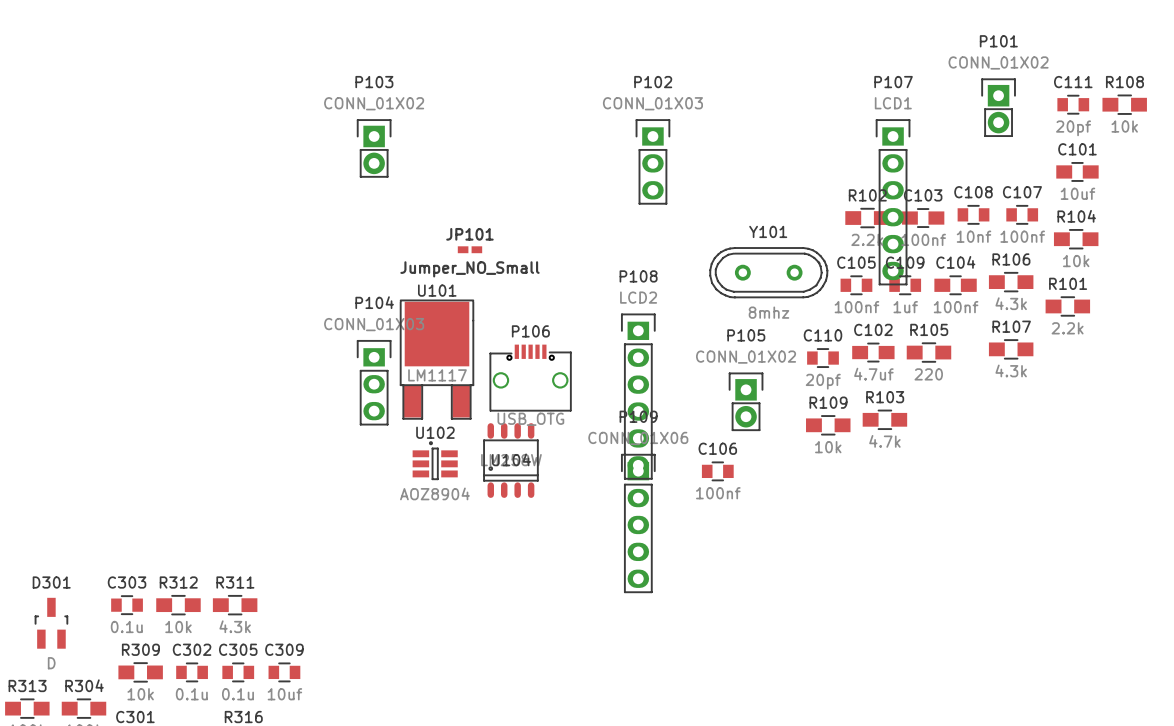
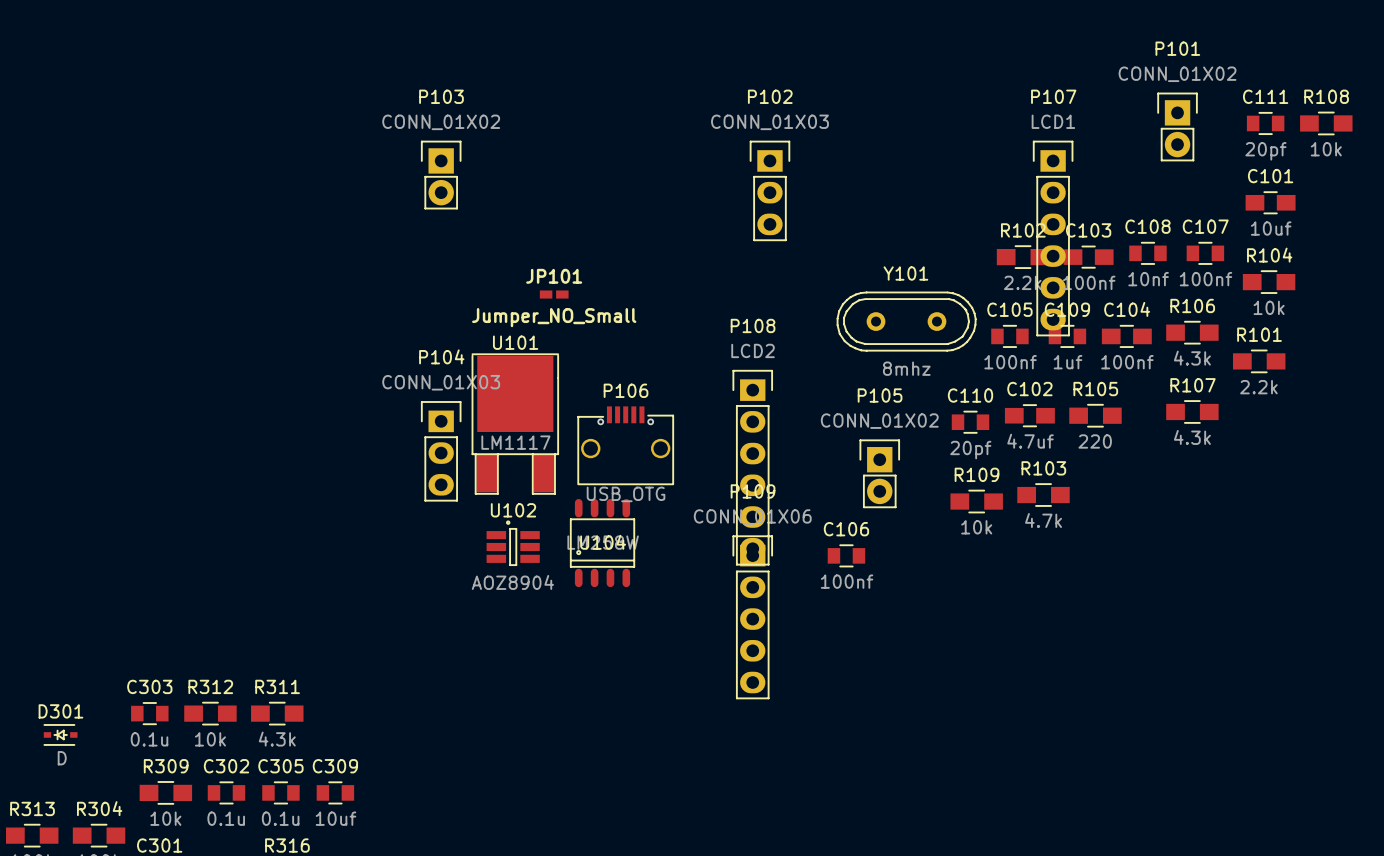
D301 footprint: [34, 597, 69, 649] -> [43, 724, 78, 746]

